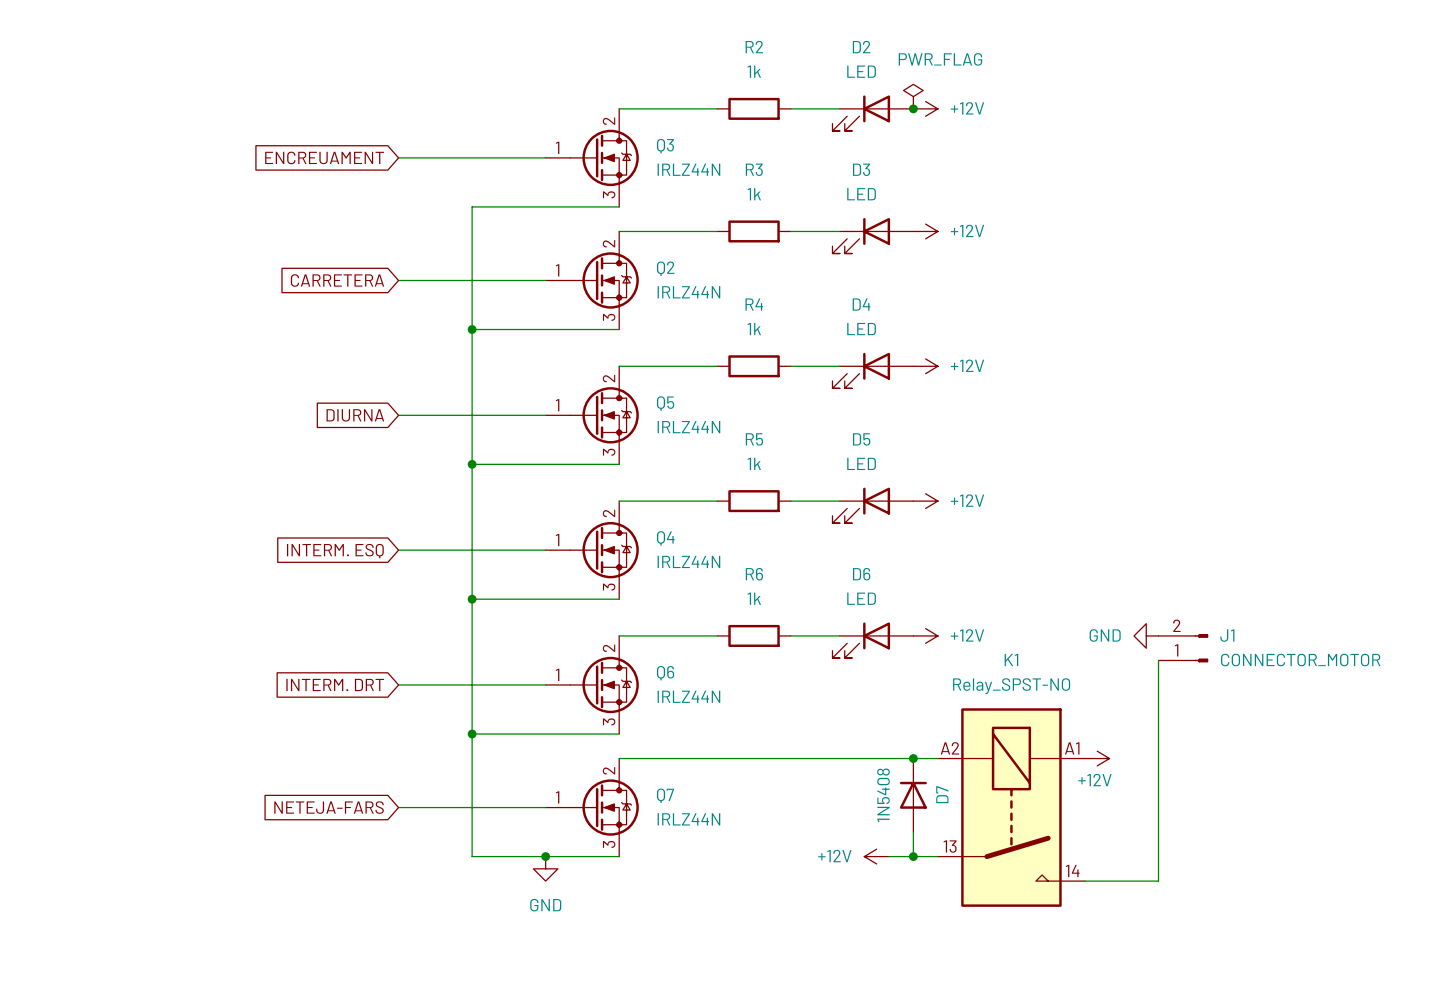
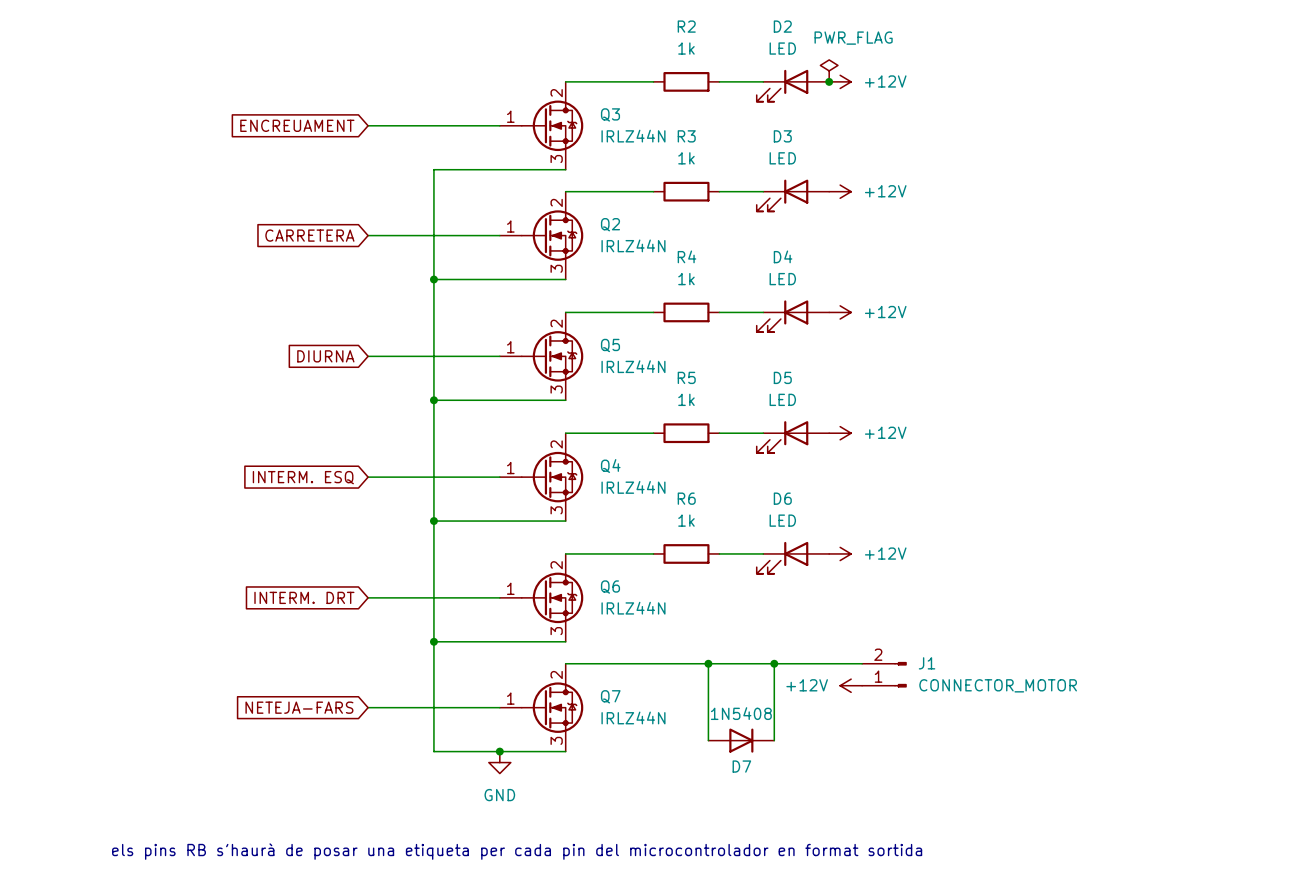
power symbol: GND (1146, 635) -> none
J1 position: (1183, 648) -> (884, 674)
wire: (1158, 660) (1158, 881) (1084, 881) -> none
wire: none -> (708, 663) (708, 740)
junction: none -> (708, 663)
wire: none -> (774, 663) (774, 740)
junction: none -> (774, 663)
junction: (913, 758) -> none
power symbol: +12V (1097, 758) -> none
power symbol: none -> +12V (851, 685)
D7 rotation: 0° (913, 795) -> 90° clockwise (741, 740)
D7 position: (913, 795) -> (741, 740)
K1: Relay_SPST-NO (1011, 807) -> none
wire: (913, 832) (913, 856) -> none
power symbol: +12V (876, 856) -> none
wire: (888, 856) (937, 856) -> none
junction: (913, 856) -> none
text: none -> els pins RB s'haurà de posar una etiqueta per cada pin del microcontrolador en format sortida (517, 851)

